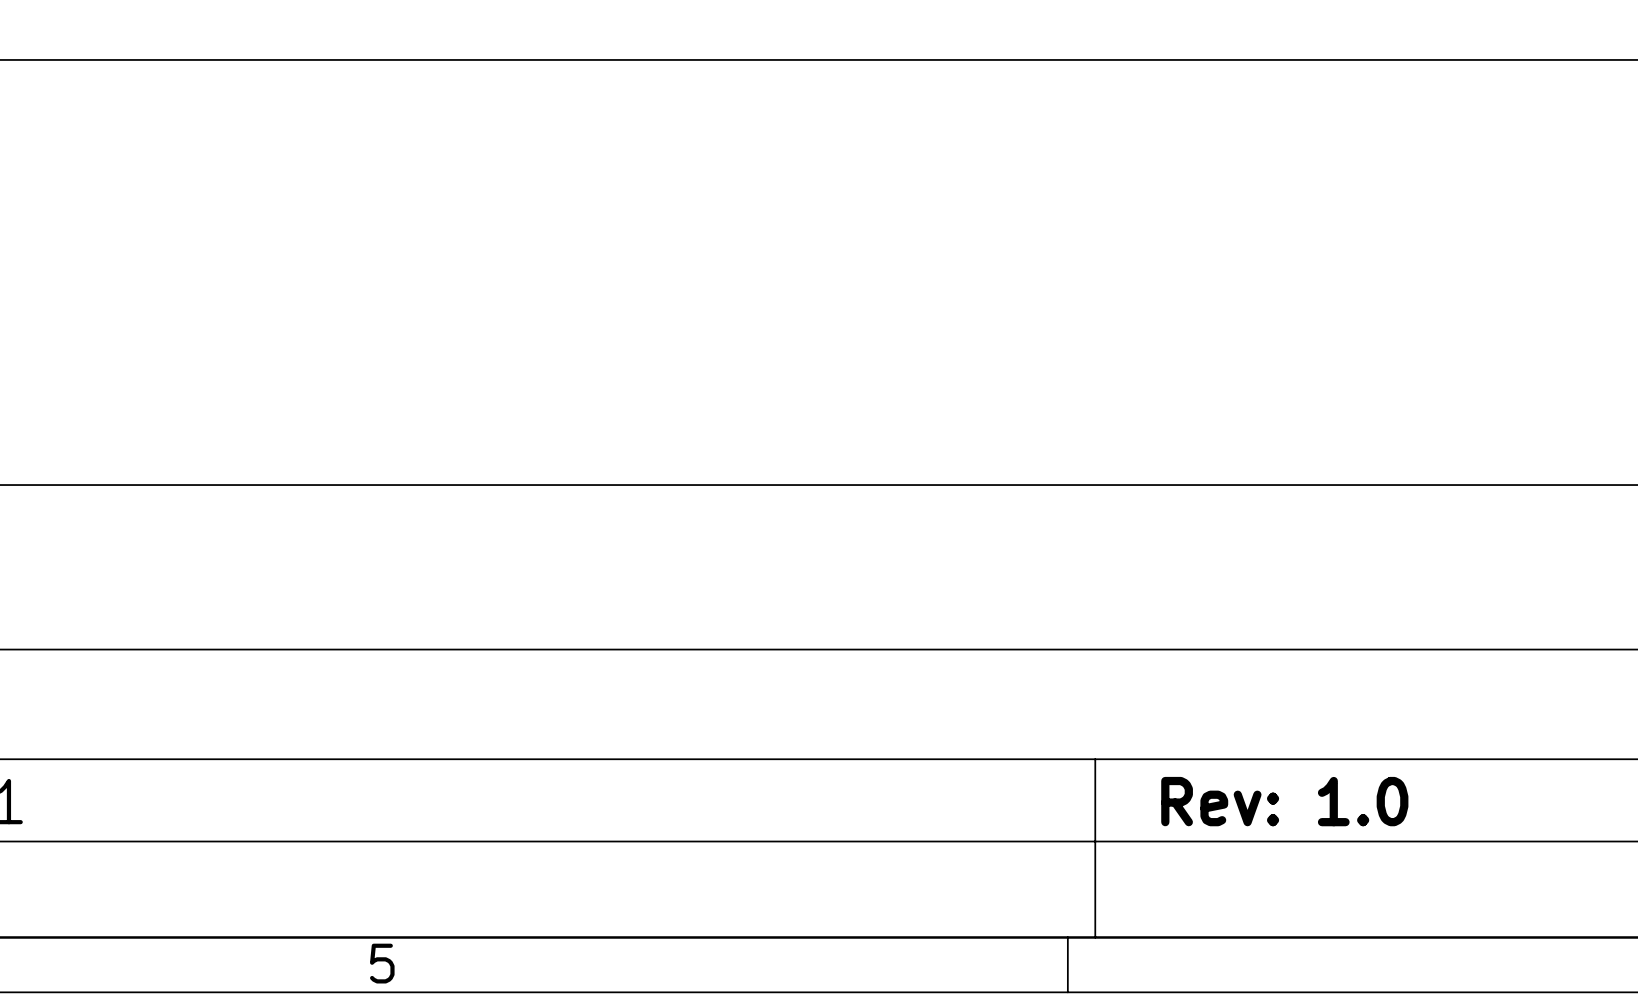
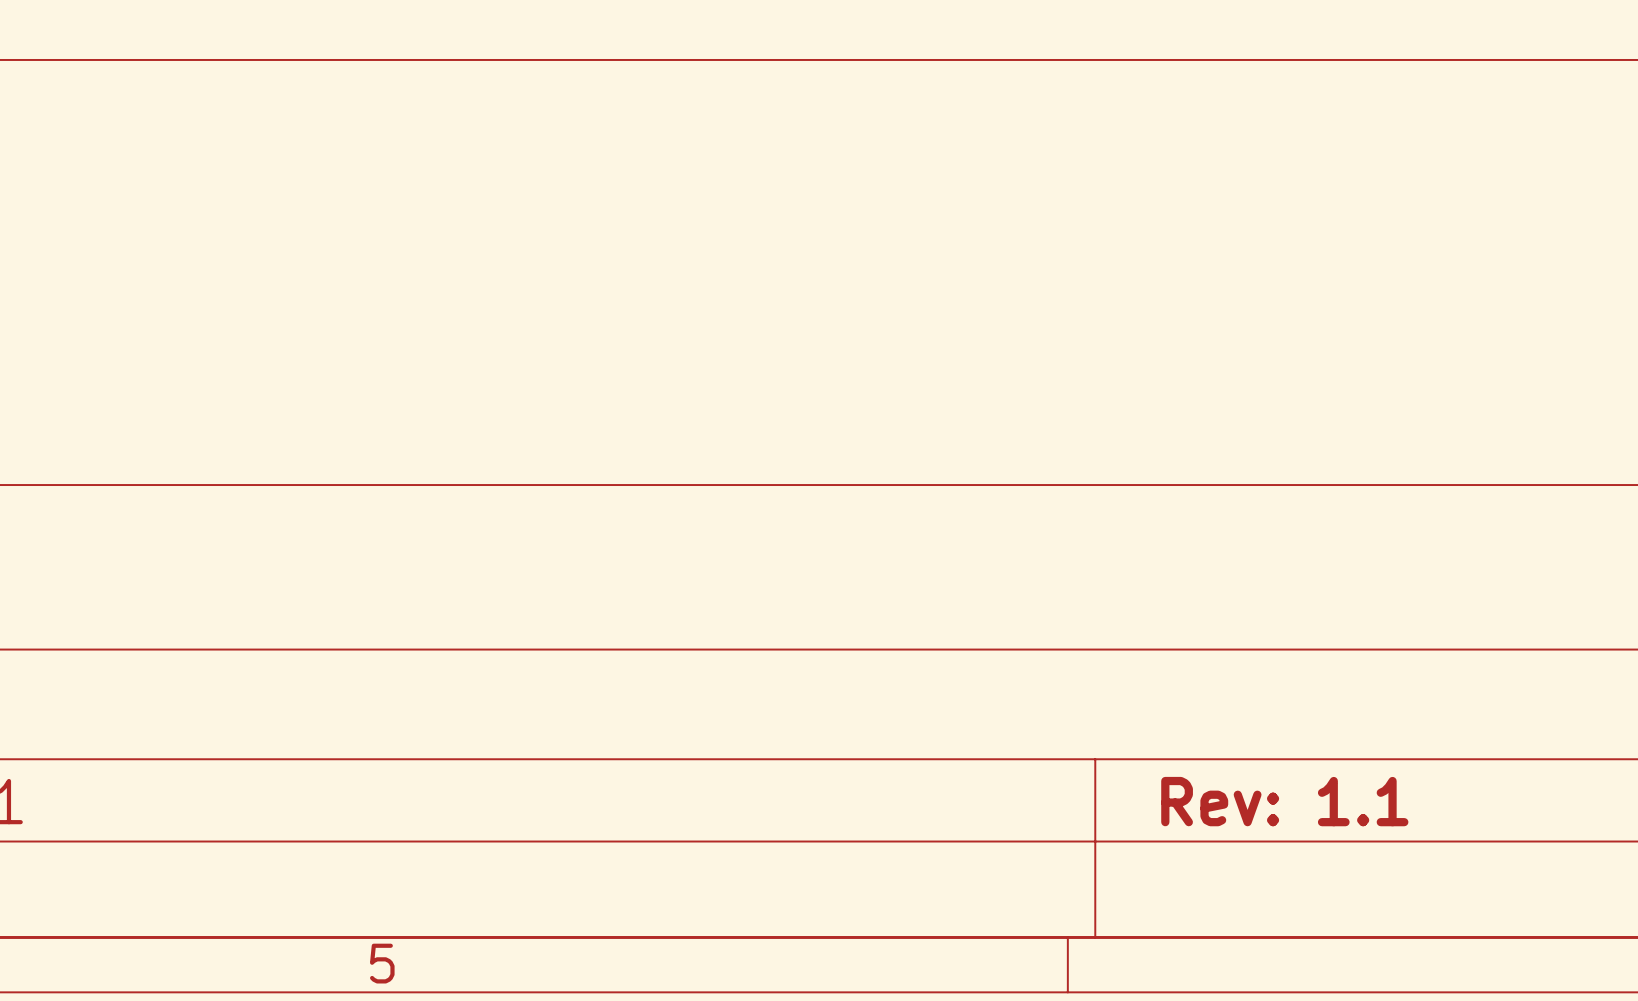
title block: Rev: 1.0 (1284, 801) -> Rev: 1.1 (1284, 801)

